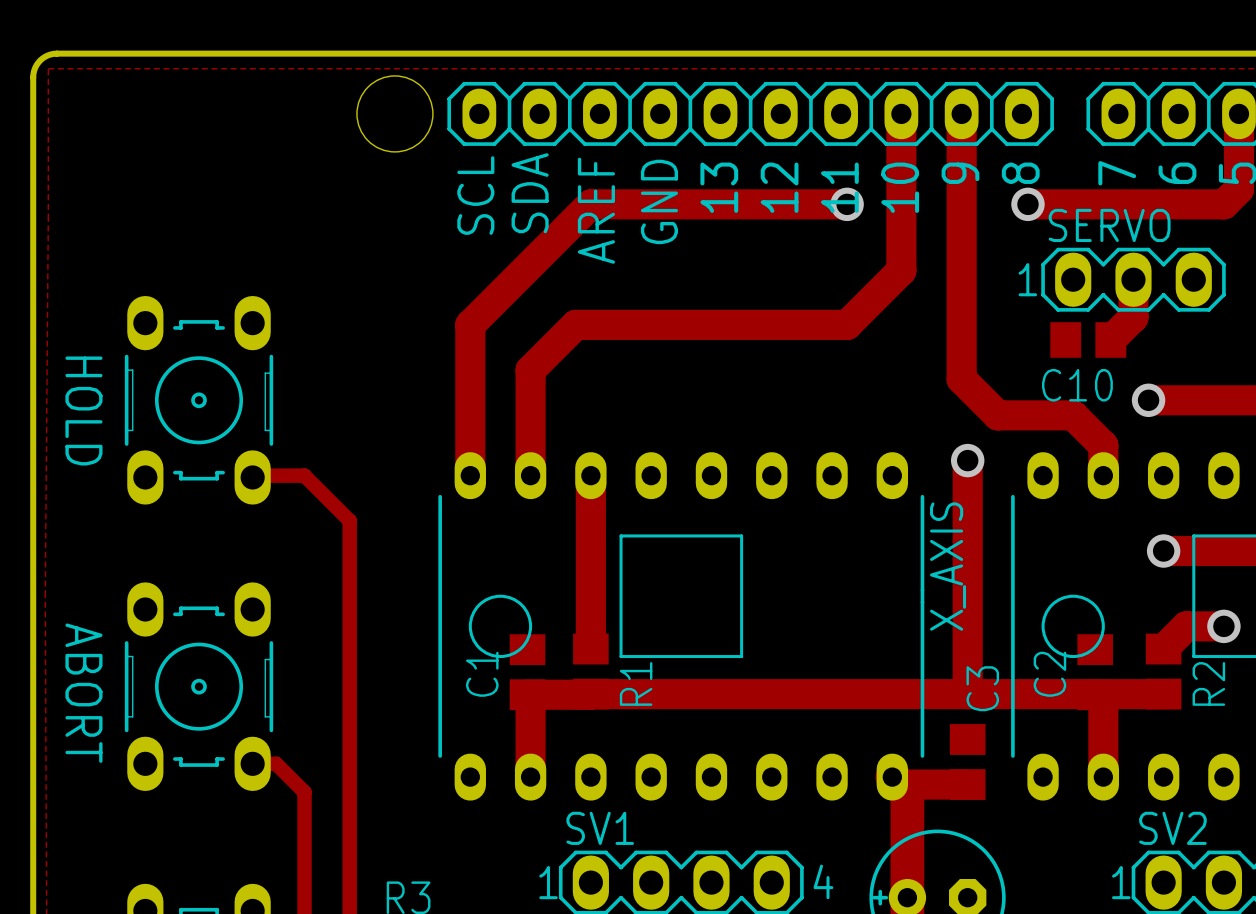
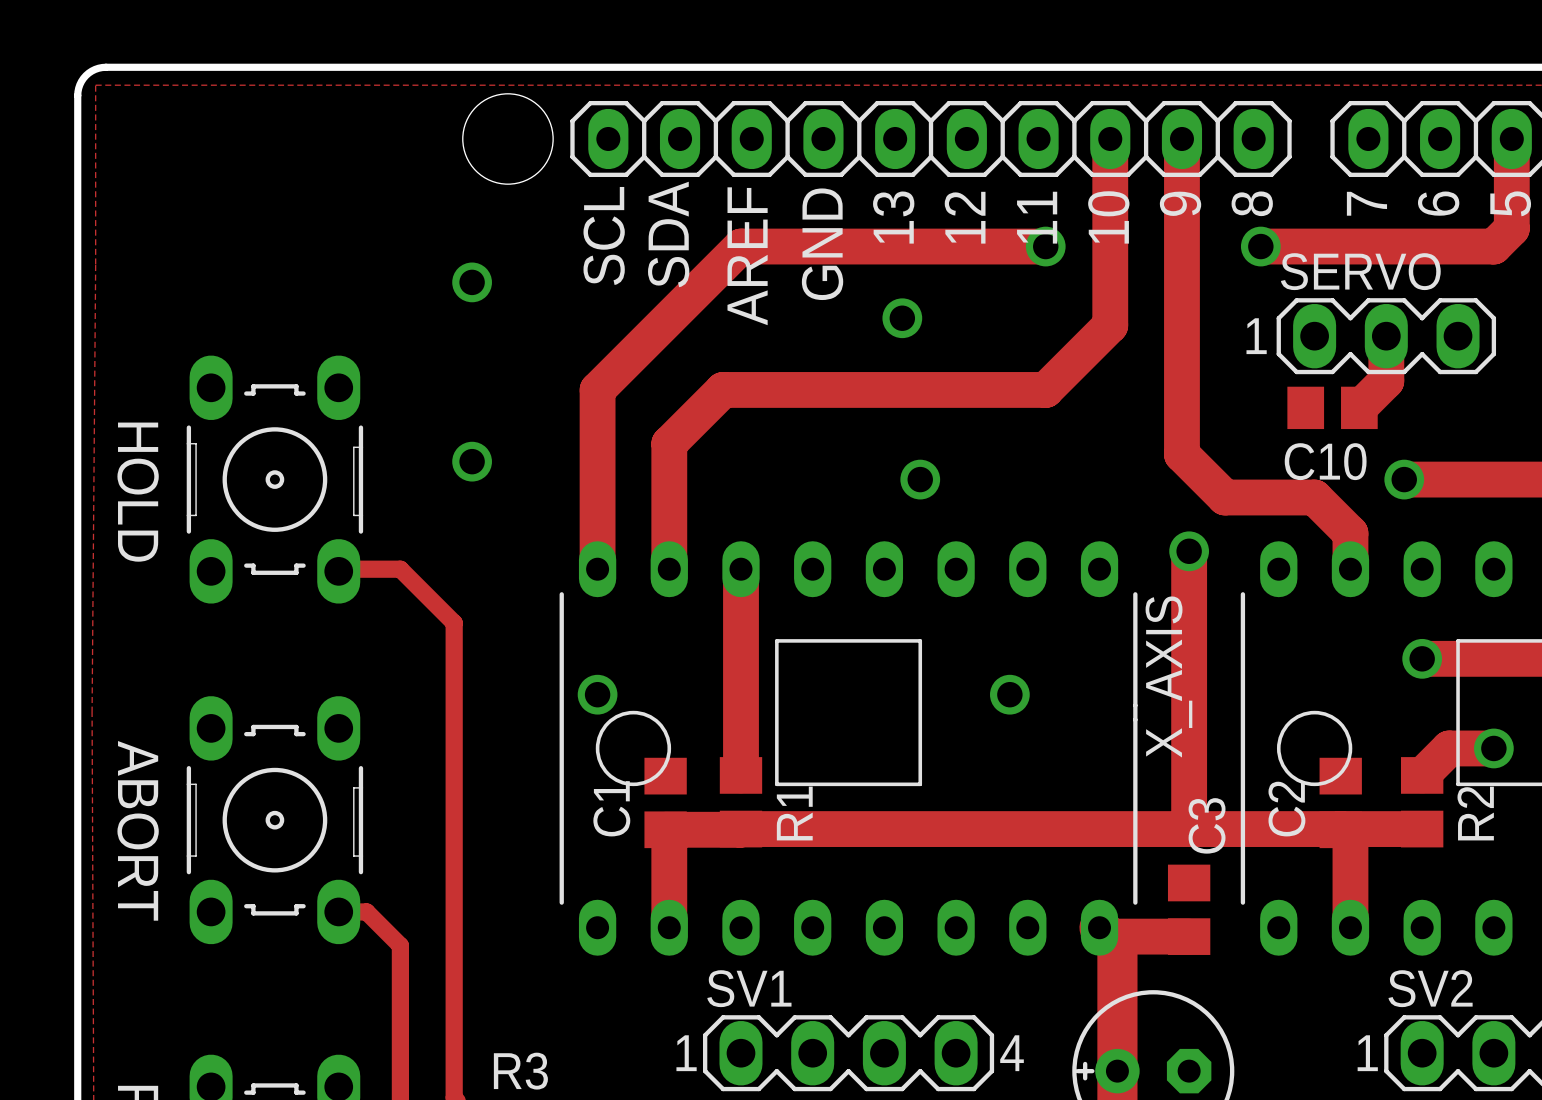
via: none -> (472, 282)
via: none -> (902, 318)
via: none -> (472, 461)
via: none -> (920, 479)
via: none -> (597, 694)
via: none -> (1009, 694)

